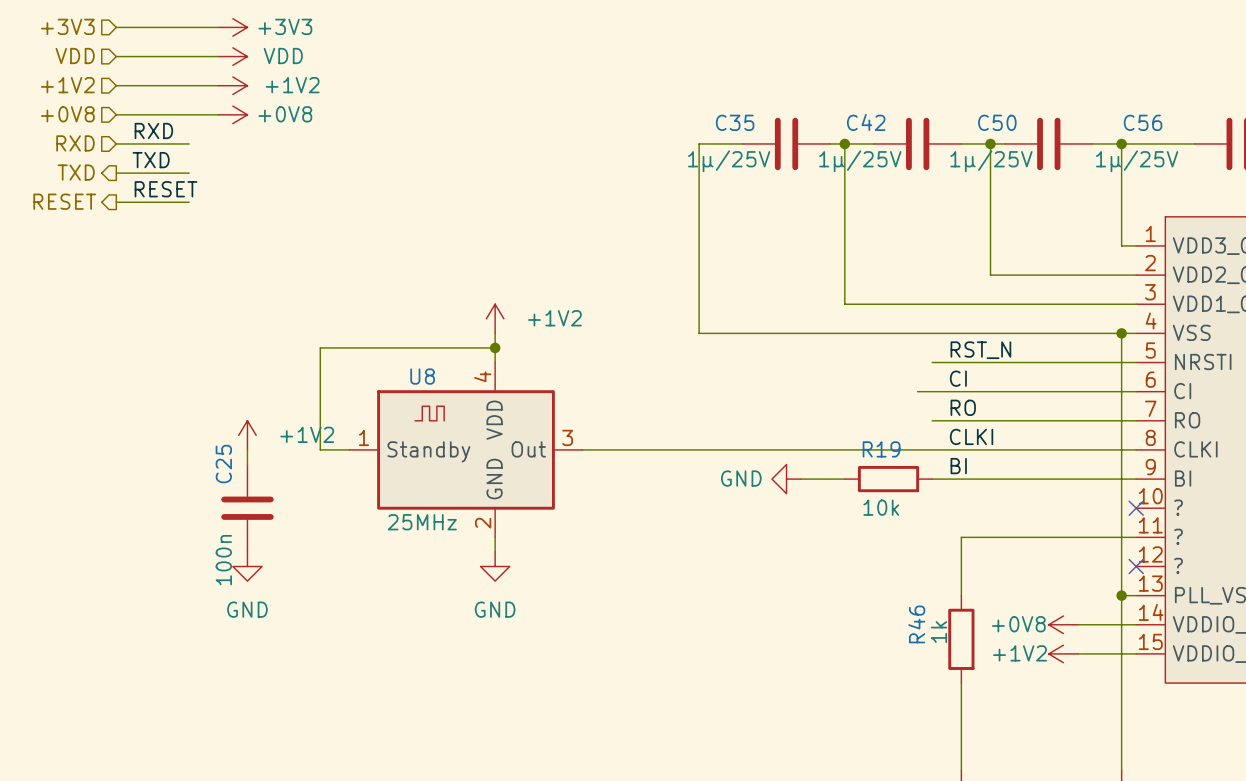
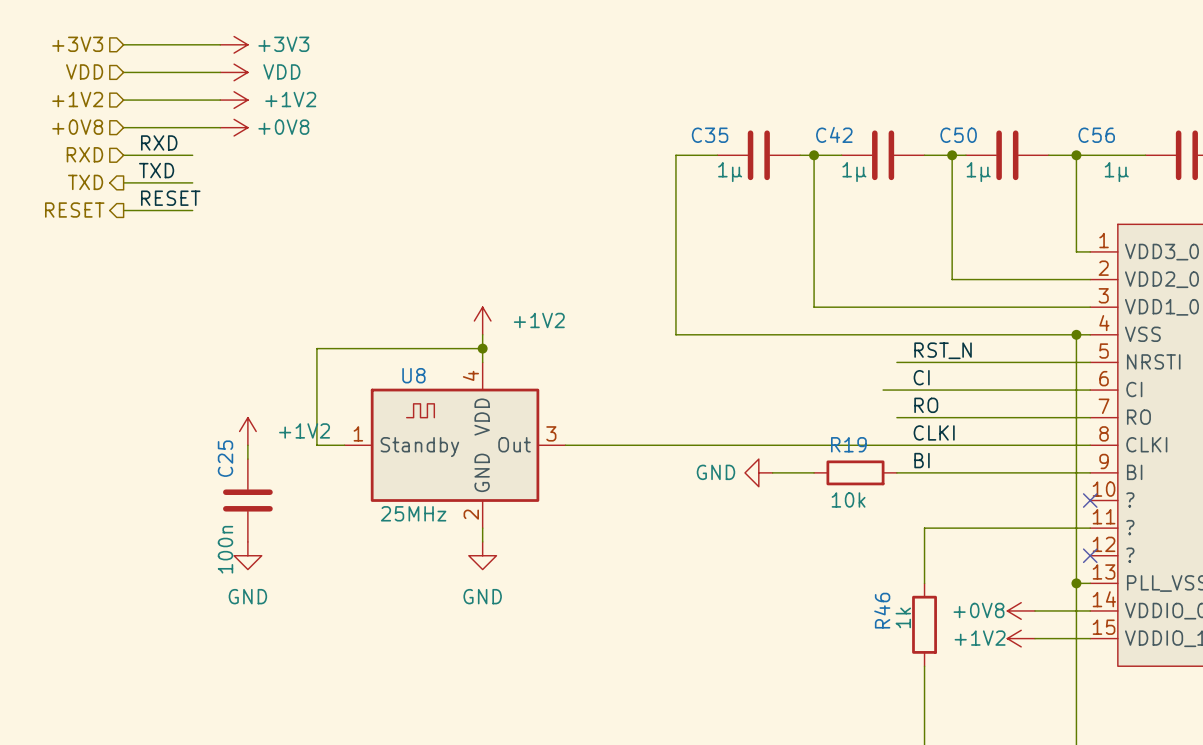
C35 value: 1µ/25V (729, 161) -> 1µ (730, 172)
C42 value: 1µ/25V (860, 161) -> 1µ (854, 172)
C50 value: 1µ/25V (991, 161) -> 1µ (978, 172)
C56 value: 1µ/25V (1137, 161) -> 1µ (1116, 172)

